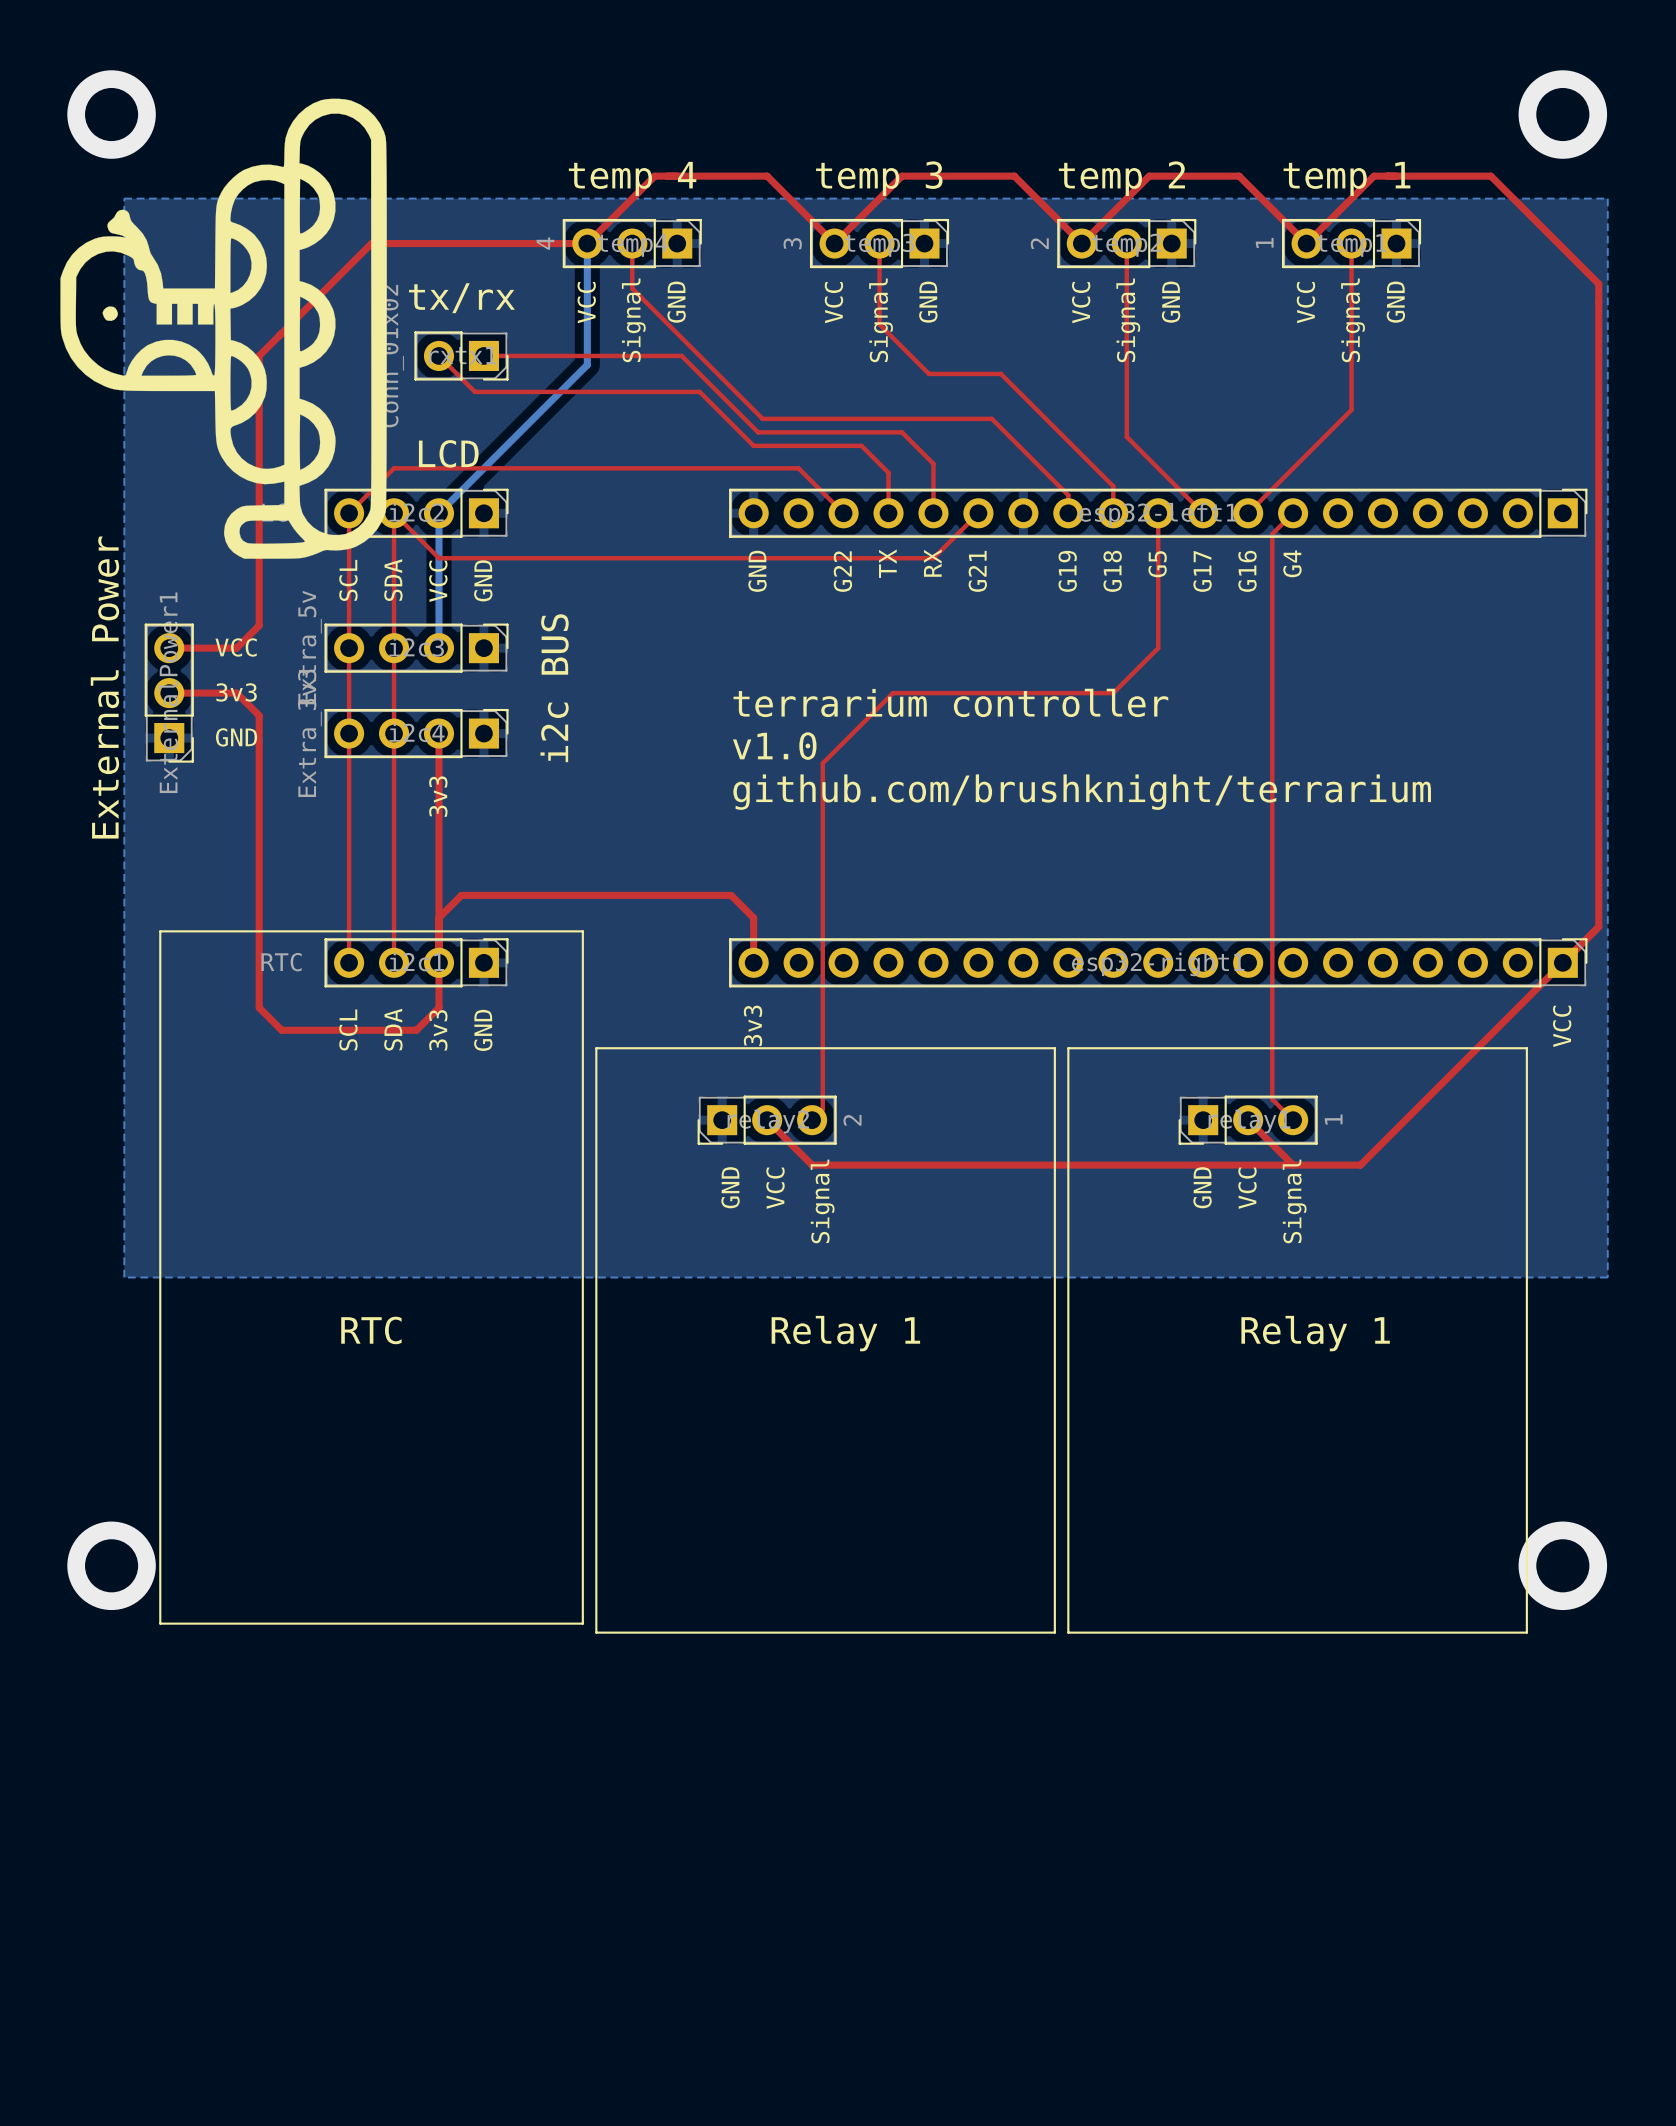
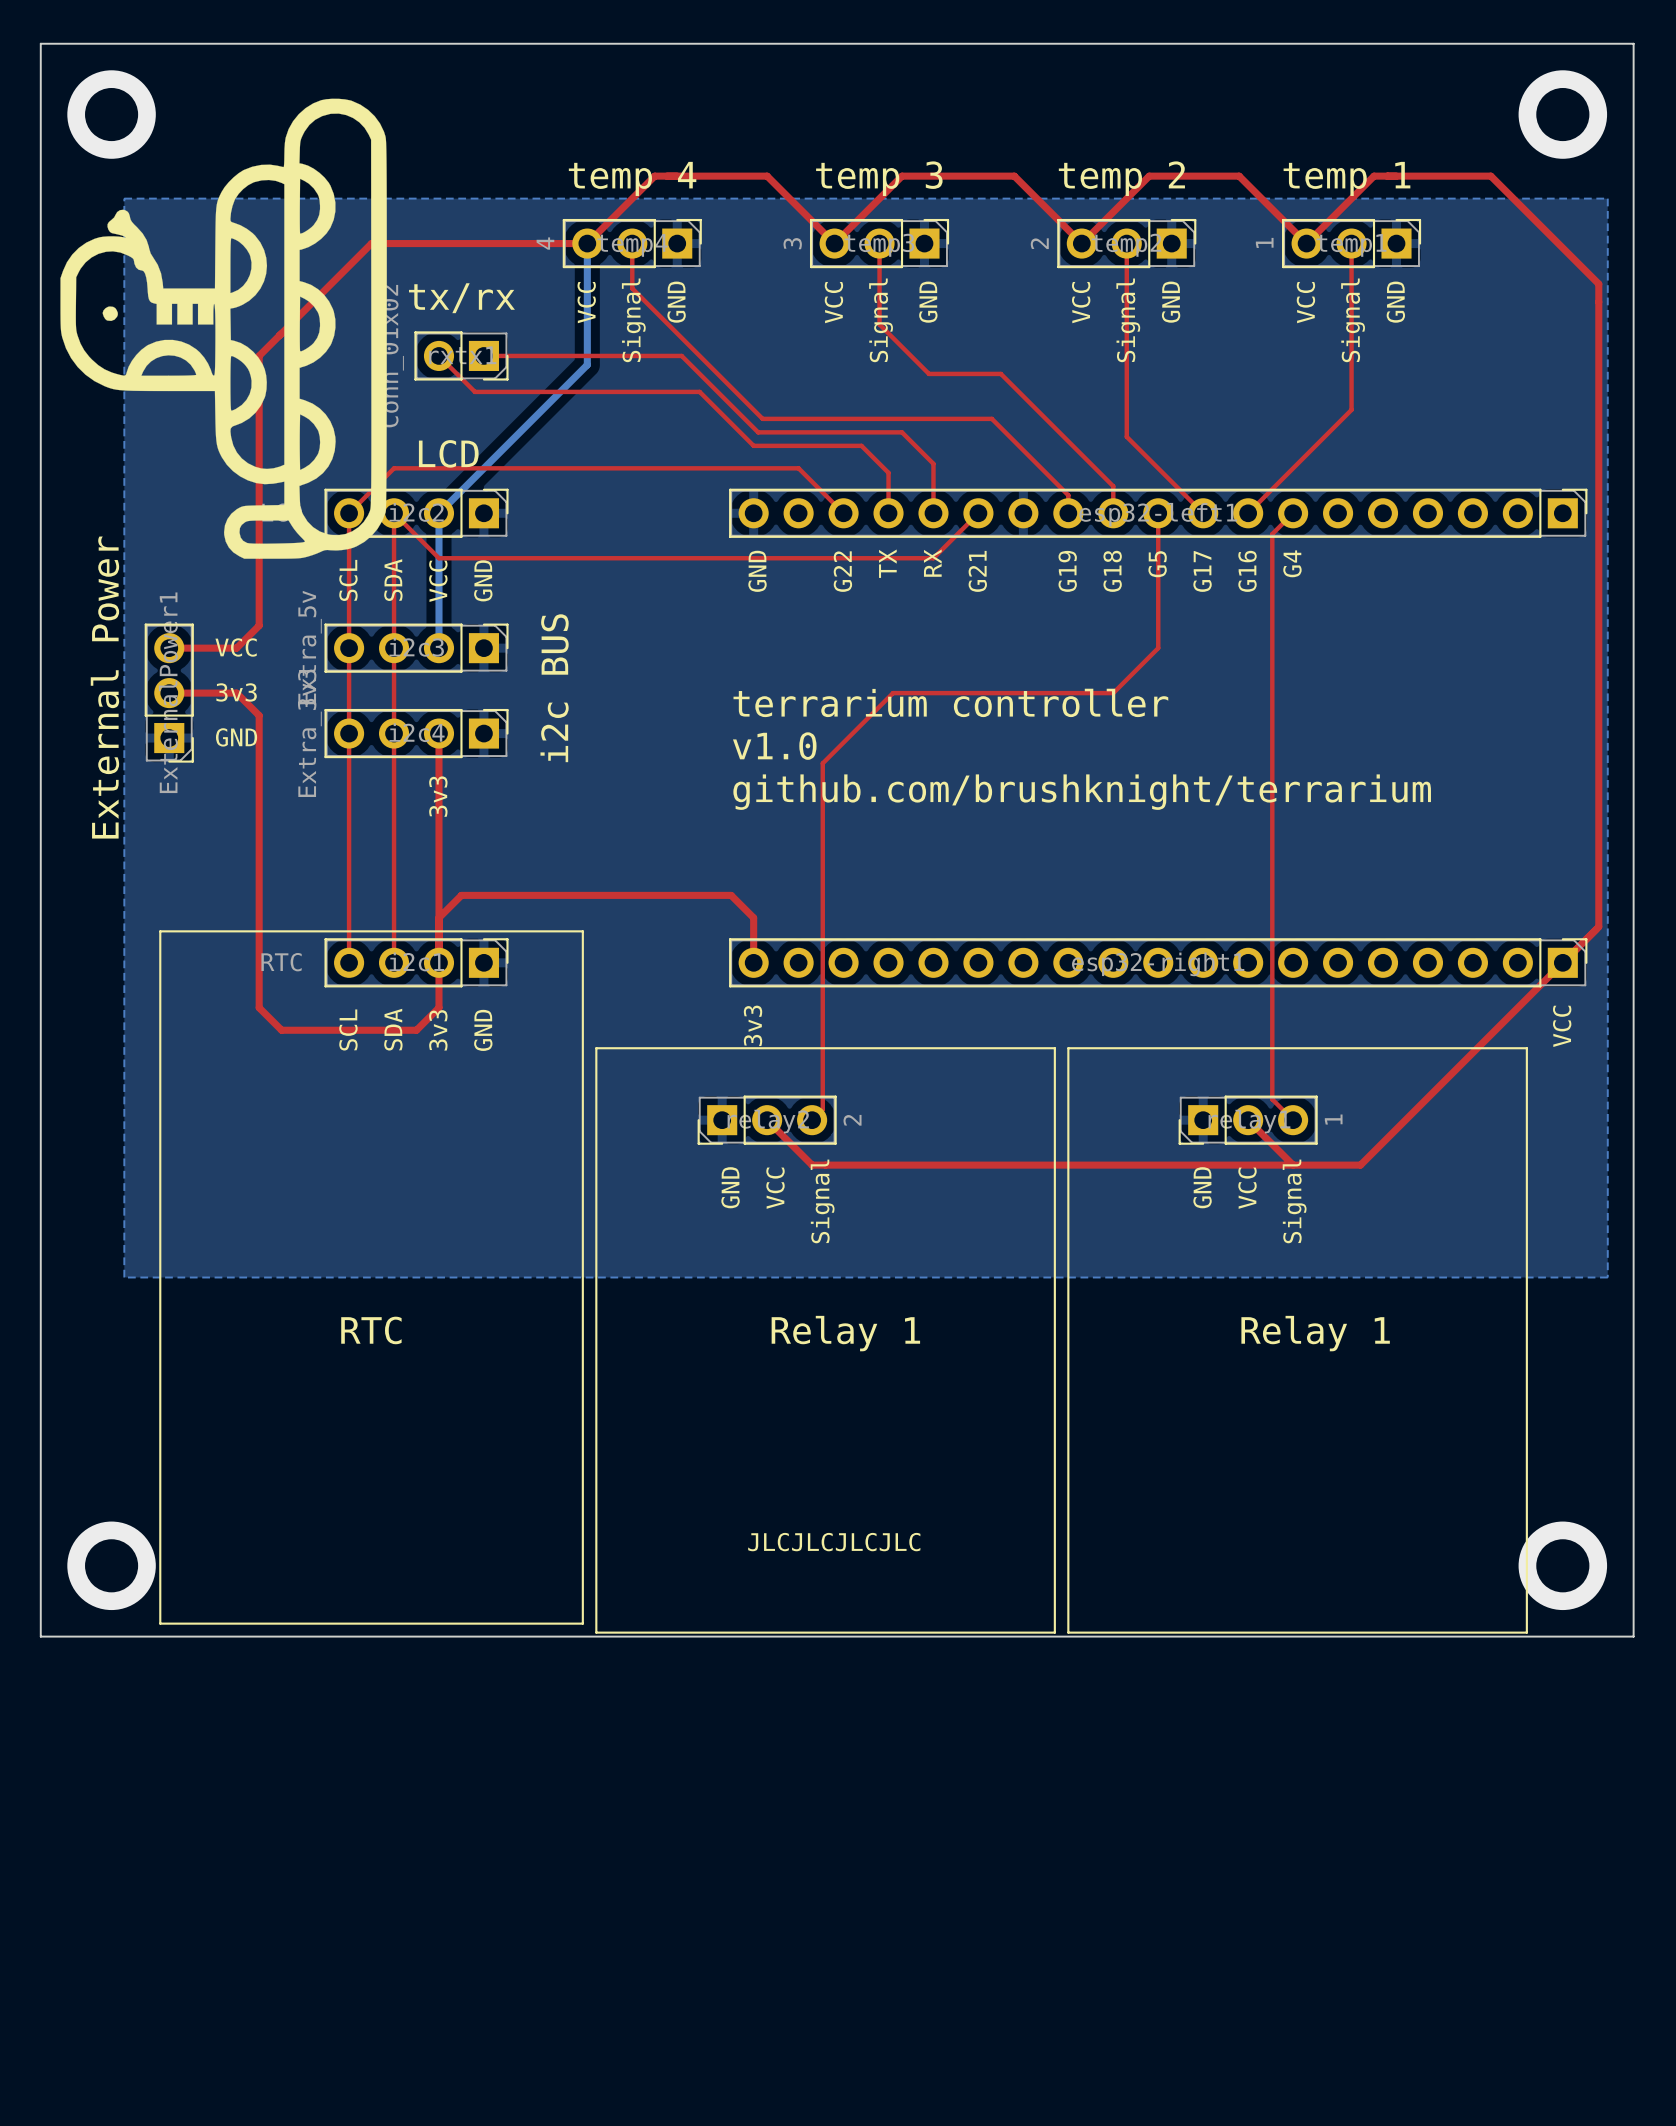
board edge: none -> (40, 43) (1633, 43) (1633, 1636) (40, 1636) (40, 43)
text: none -> JLCJLCJLCJLC (834, 1542)

